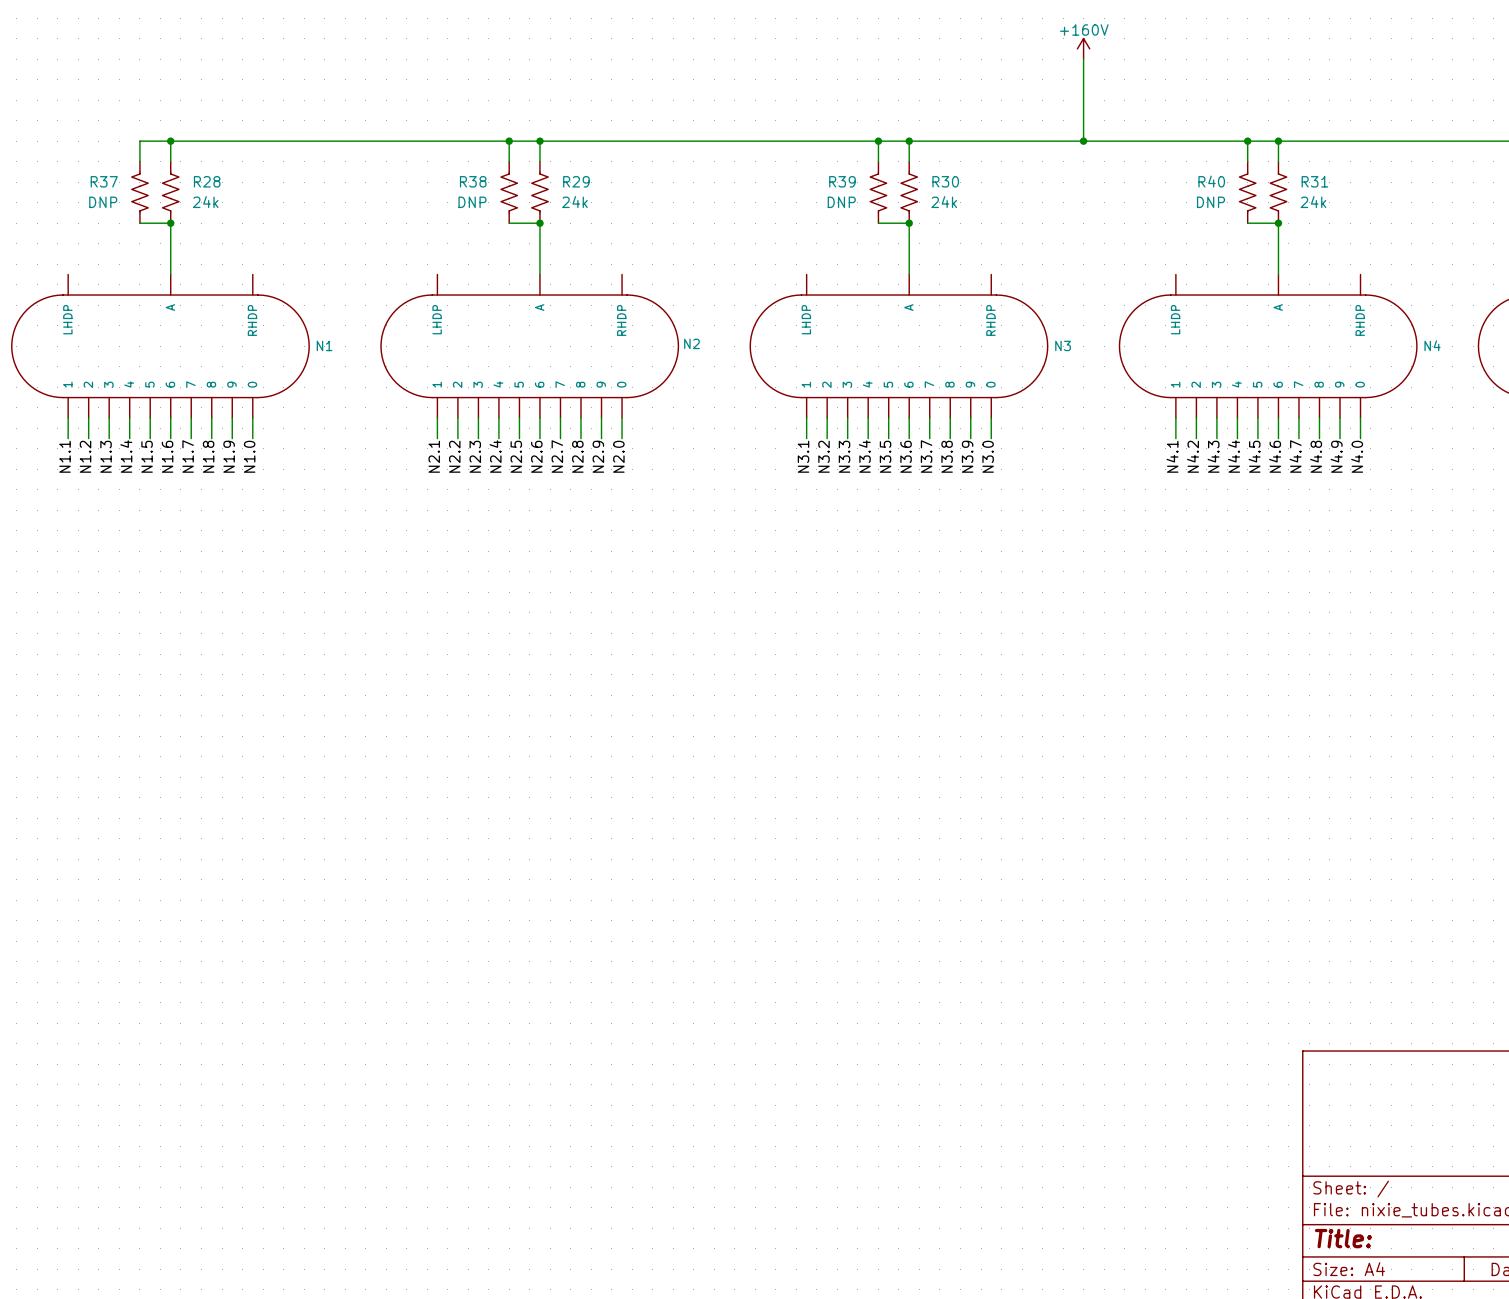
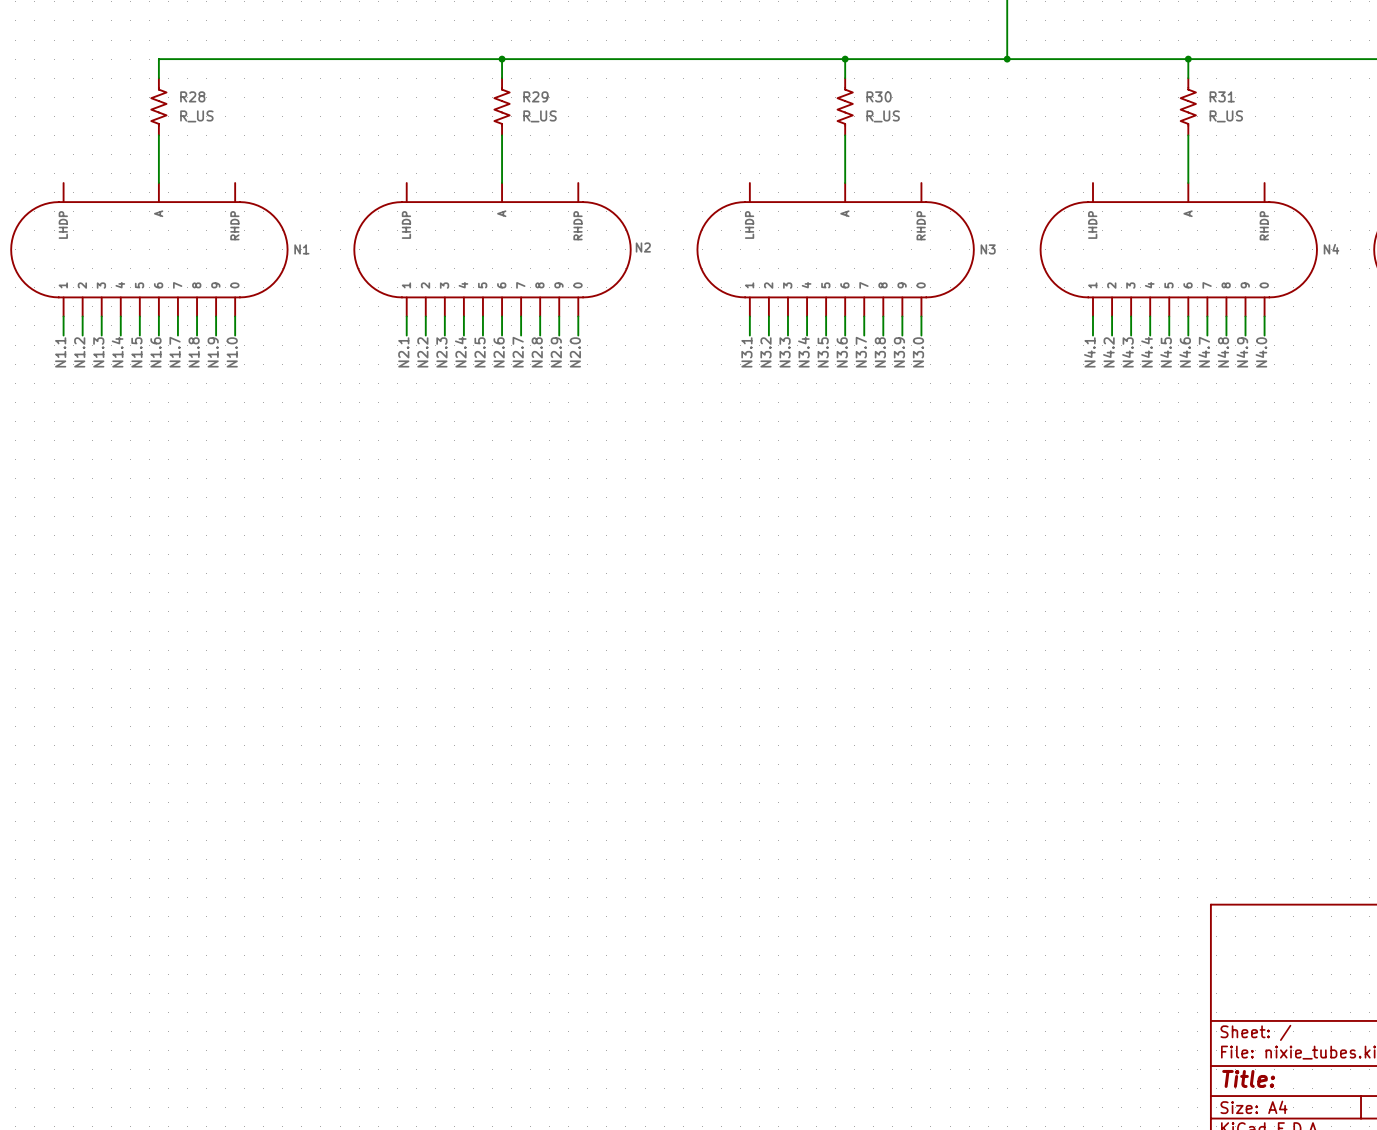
wire: (170, 141) (139, 141) (139, 161) -> none
junction: (170, 141) -> none
wire: (509, 141) (509, 161) -> none
junction: (509, 141) -> none
wire: (878, 141) (878, 161) -> none
junction: (878, 141) -> none
wire: (1247, 141) (1247, 161) -> none
junction: (1247, 141) -> none
R37: DNP (139, 192) -> none
R38: DNP (509, 192) -> none
R39: DNP (878, 192) -> none
R40: DNP (1247, 192) -> none
R28 value: 24k (205, 202) -> R_US (196, 116)
R29 value: 24k (574, 202) -> R_US (540, 116)
R30 value: 24k (944, 202) -> R_US (883, 116)
R31 value: 24k (1313, 202) -> R_US (1226, 116)
wire: (139, 223) (170, 223) -> none
junction: (170, 223) -> none
wire: (509, 223) (539, 223) -> none
junction: (539, 223) -> none
wire: (878, 223) (909, 223) -> none
junction: (909, 223) -> none
wire: (1247, 223) (1278, 223) -> none
junction: (1278, 223) -> none

